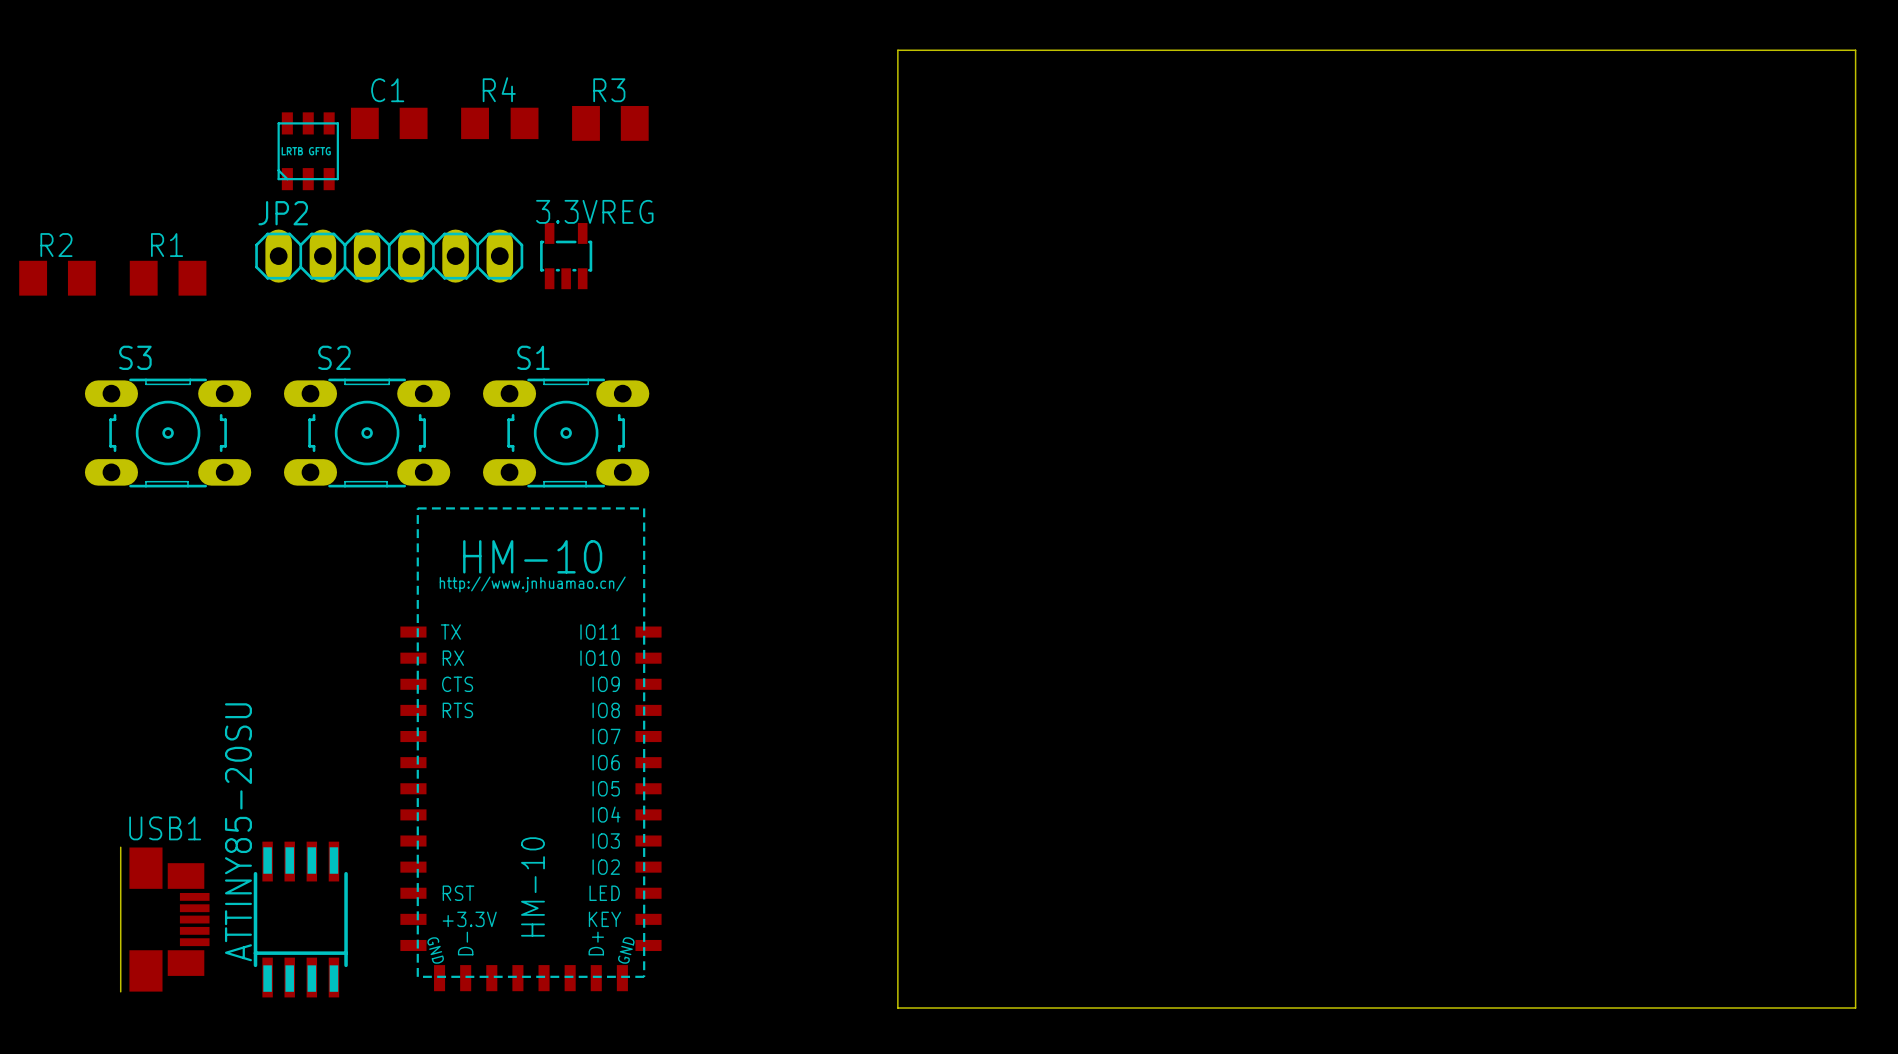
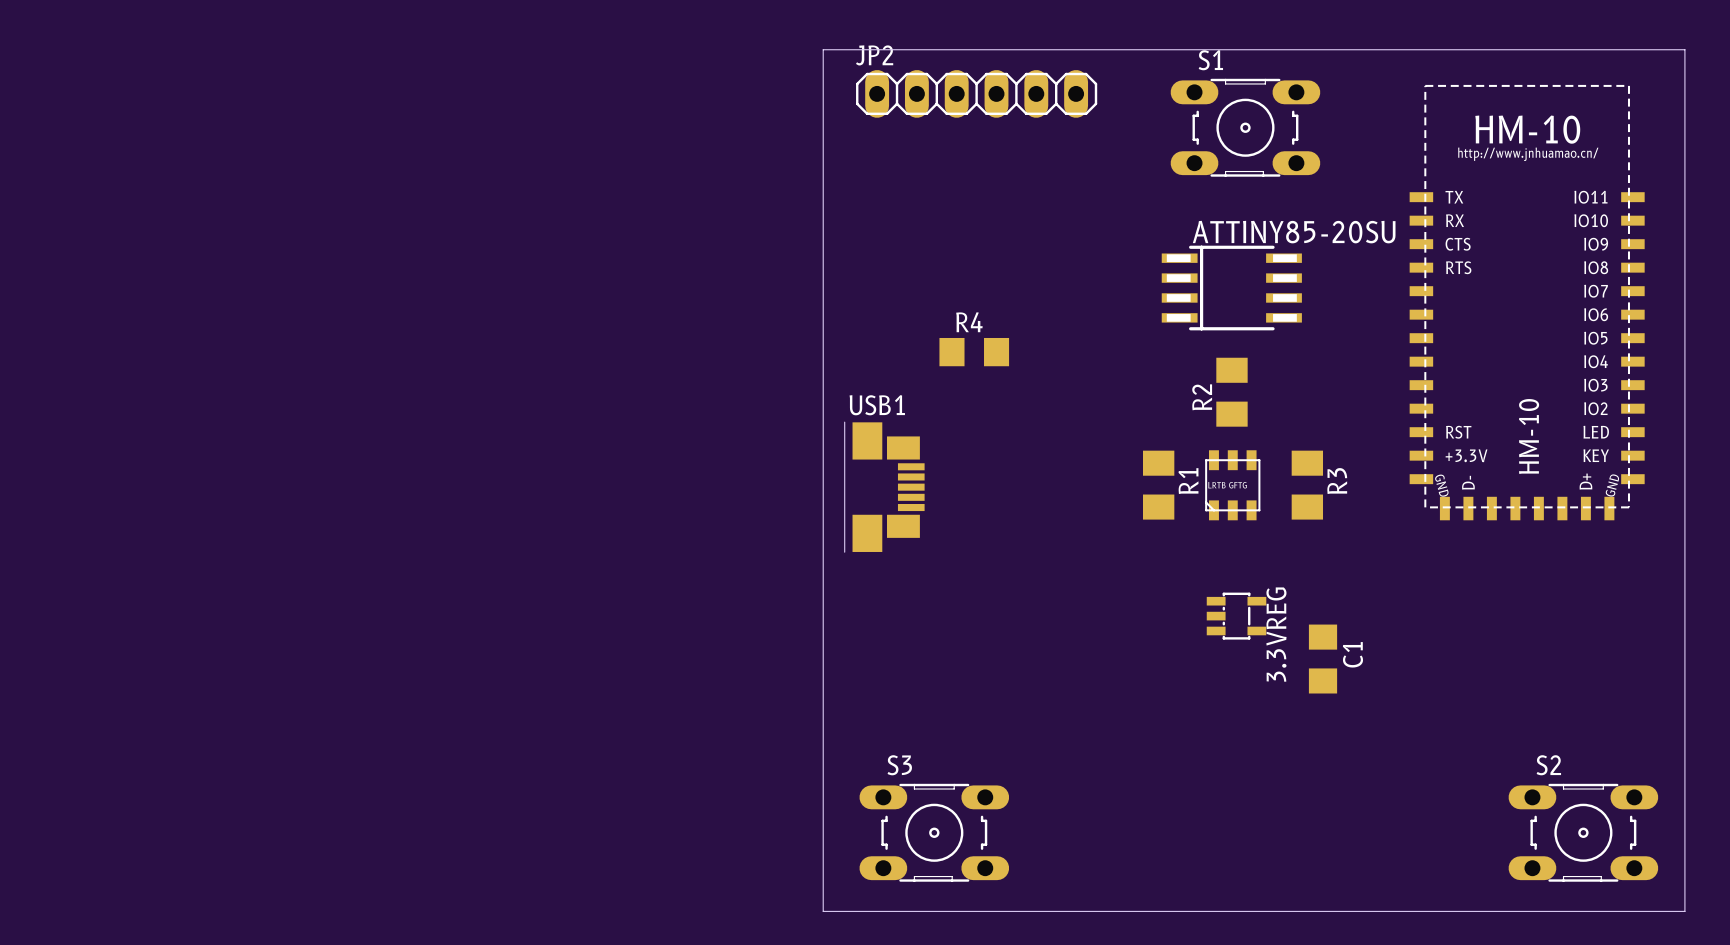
C1 rotation: 0° (389, 123) -> 90° clockwise (1323, 659)
C1 position: (389, 123) -> (1323, 659)
R4 position: (499, 123) -> (974, 352)
R3 rotation: 0° (610, 123) -> 90° clockwise (1307, 485)
R3 position: (610, 123) -> (1307, 485)
part: (308, 151) -> none
R2 name position: R2 (56, 245) -> R2 (1202, 397)
JP2 position: (389, 256) -> (976, 93)
3.3VREG rotation: 0° (566, 256) -> 90° clockwise (1236, 616)
3.3VREG position: (566, 256) -> (1236, 616)
R2 rotation: 0° (57, 278) -> 90° clockwise (1231, 392)
R2 position: (57, 278) -> (1231, 392)
R1 rotation: 0° (168, 278) -> 90° clockwise (1158, 485)
R1 position: (168, 278) -> (1158, 485)
S3 position: (168, 433) -> (934, 832)
S2 position: (367, 433) -> (1583, 832)
S1 position: (566, 433) -> (1245, 127)
part: none -> (1232, 485)
HM-10 position: (530, 749) -> (1527, 302)
USB1 position: (165, 919) -> (884, 487)
ATTINY85-20SU rotation: 0° (300, 919) -> 90° clockwise (1231, 288)
ATTINY85-20SU position: (300, 919) -> (1231, 288)

